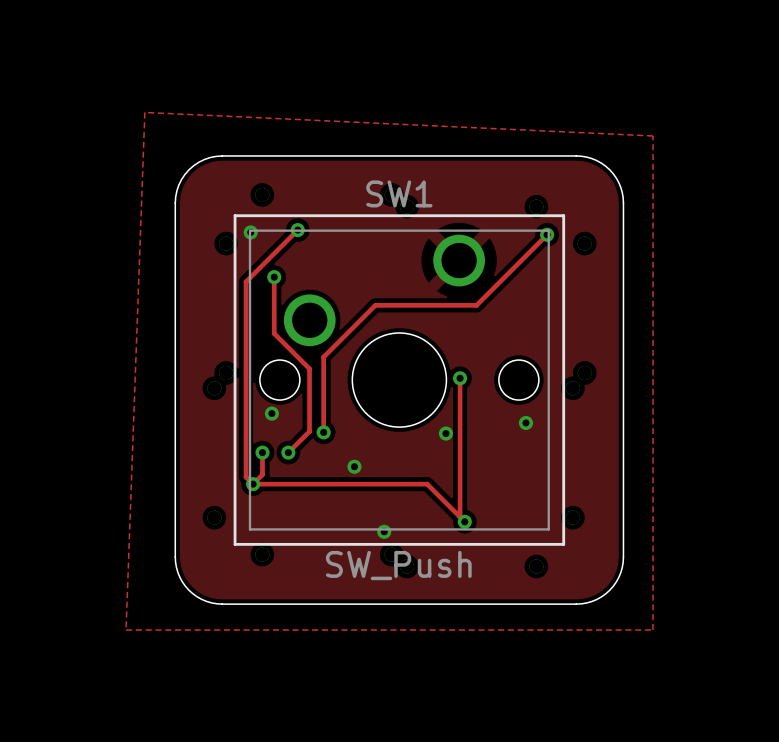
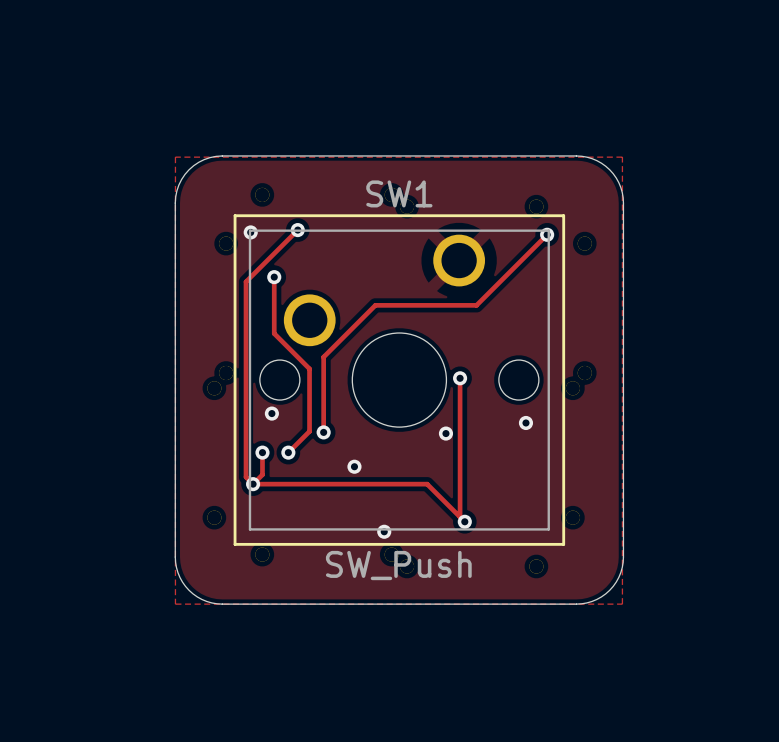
zone outline: (144, 112) (653, 135) (653, 630) (126, 630) (144, 112) -> (175, 157) (175, 604) (622, 604) (622, 157) (175, 157)

